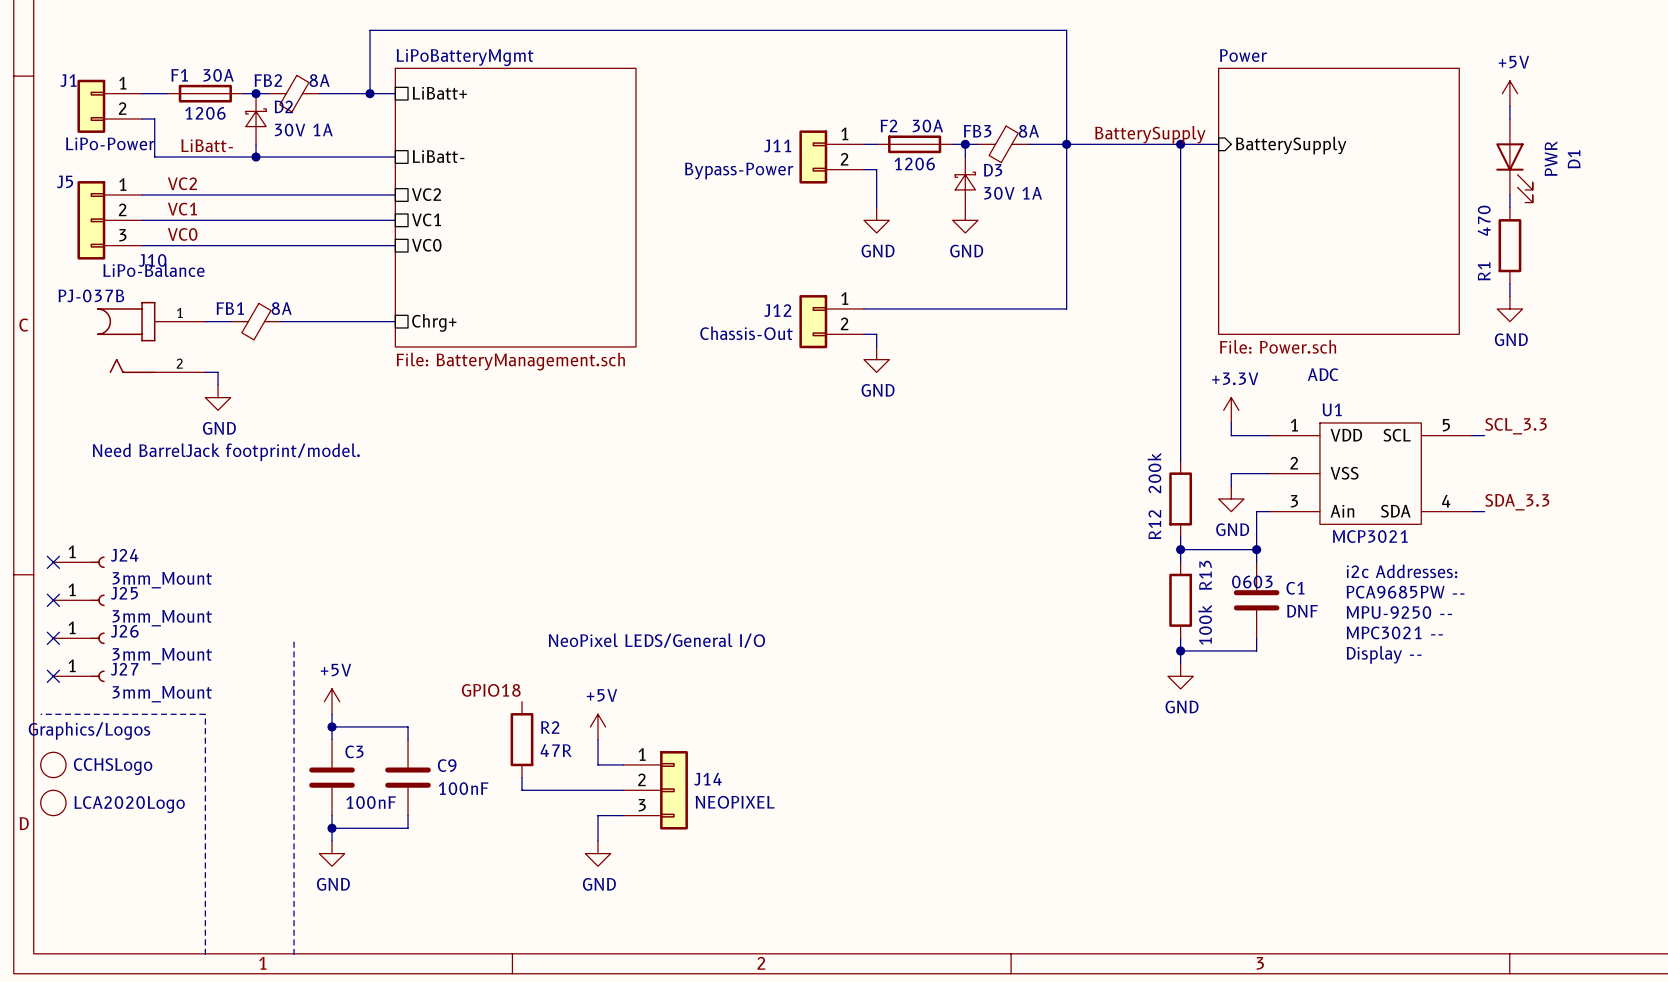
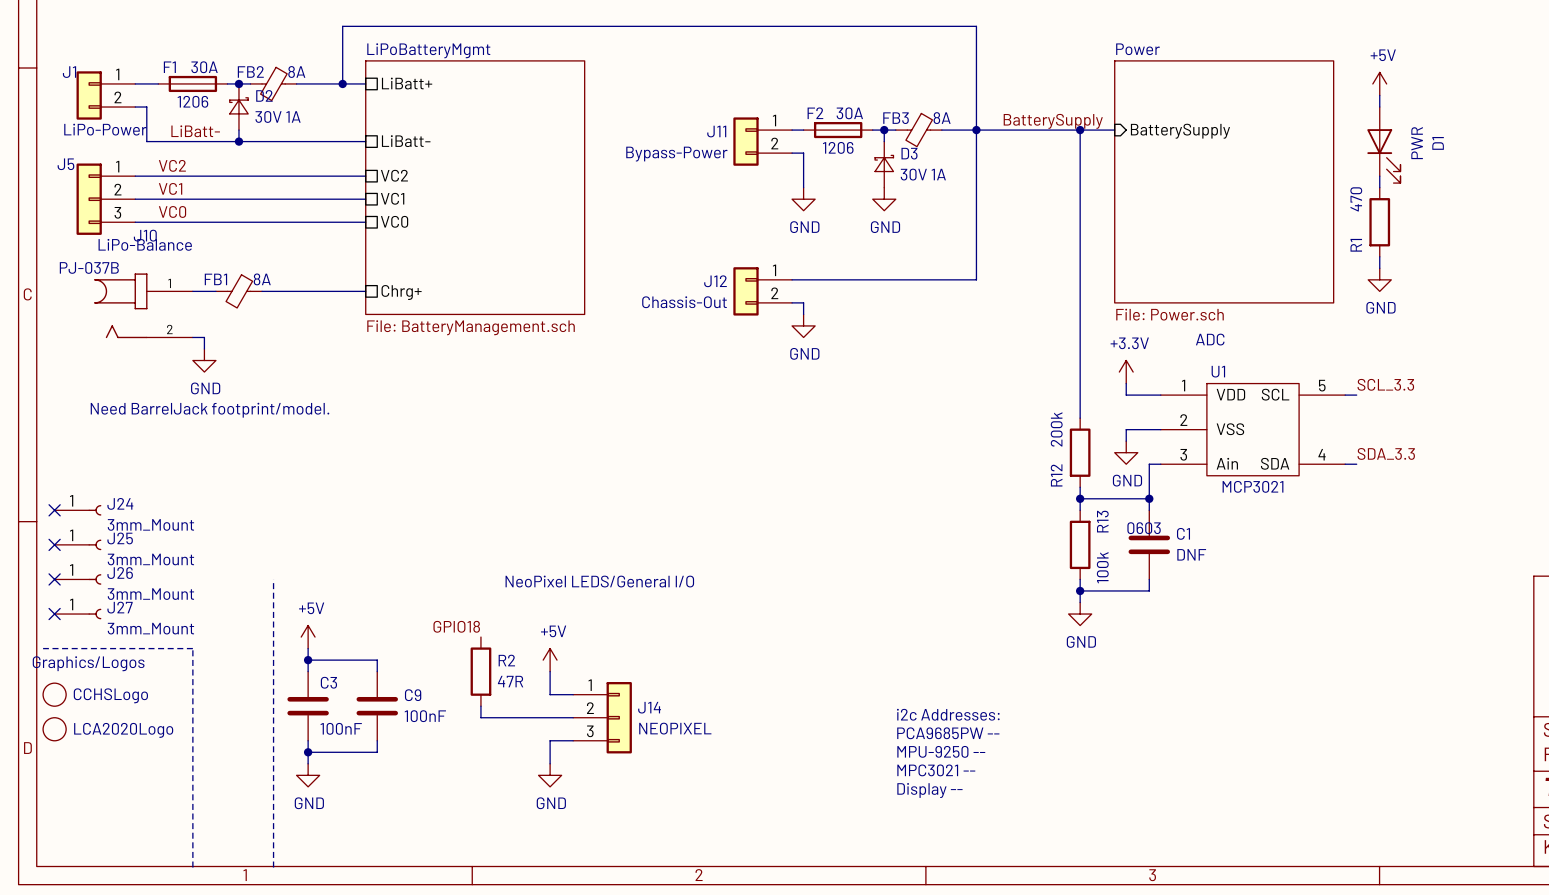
text: i2c Addresses: (1402, 571) -> none
text: PCA9685PW -- (1405, 592) -> none
text: MPU-9250 -- (1399, 612) -> none
text: MPC3021 -- (1394, 632) -> none
text: Display -- (1384, 654) -> none
text: none -> i2c Addresses: (948, 714)
text: none -> PCA9685PW -- (948, 733)
text: none -> MPU-9250 -- (941, 751)
text: none -> MPC3021 -- (936, 770)
text: none -> Display -- (929, 790)

